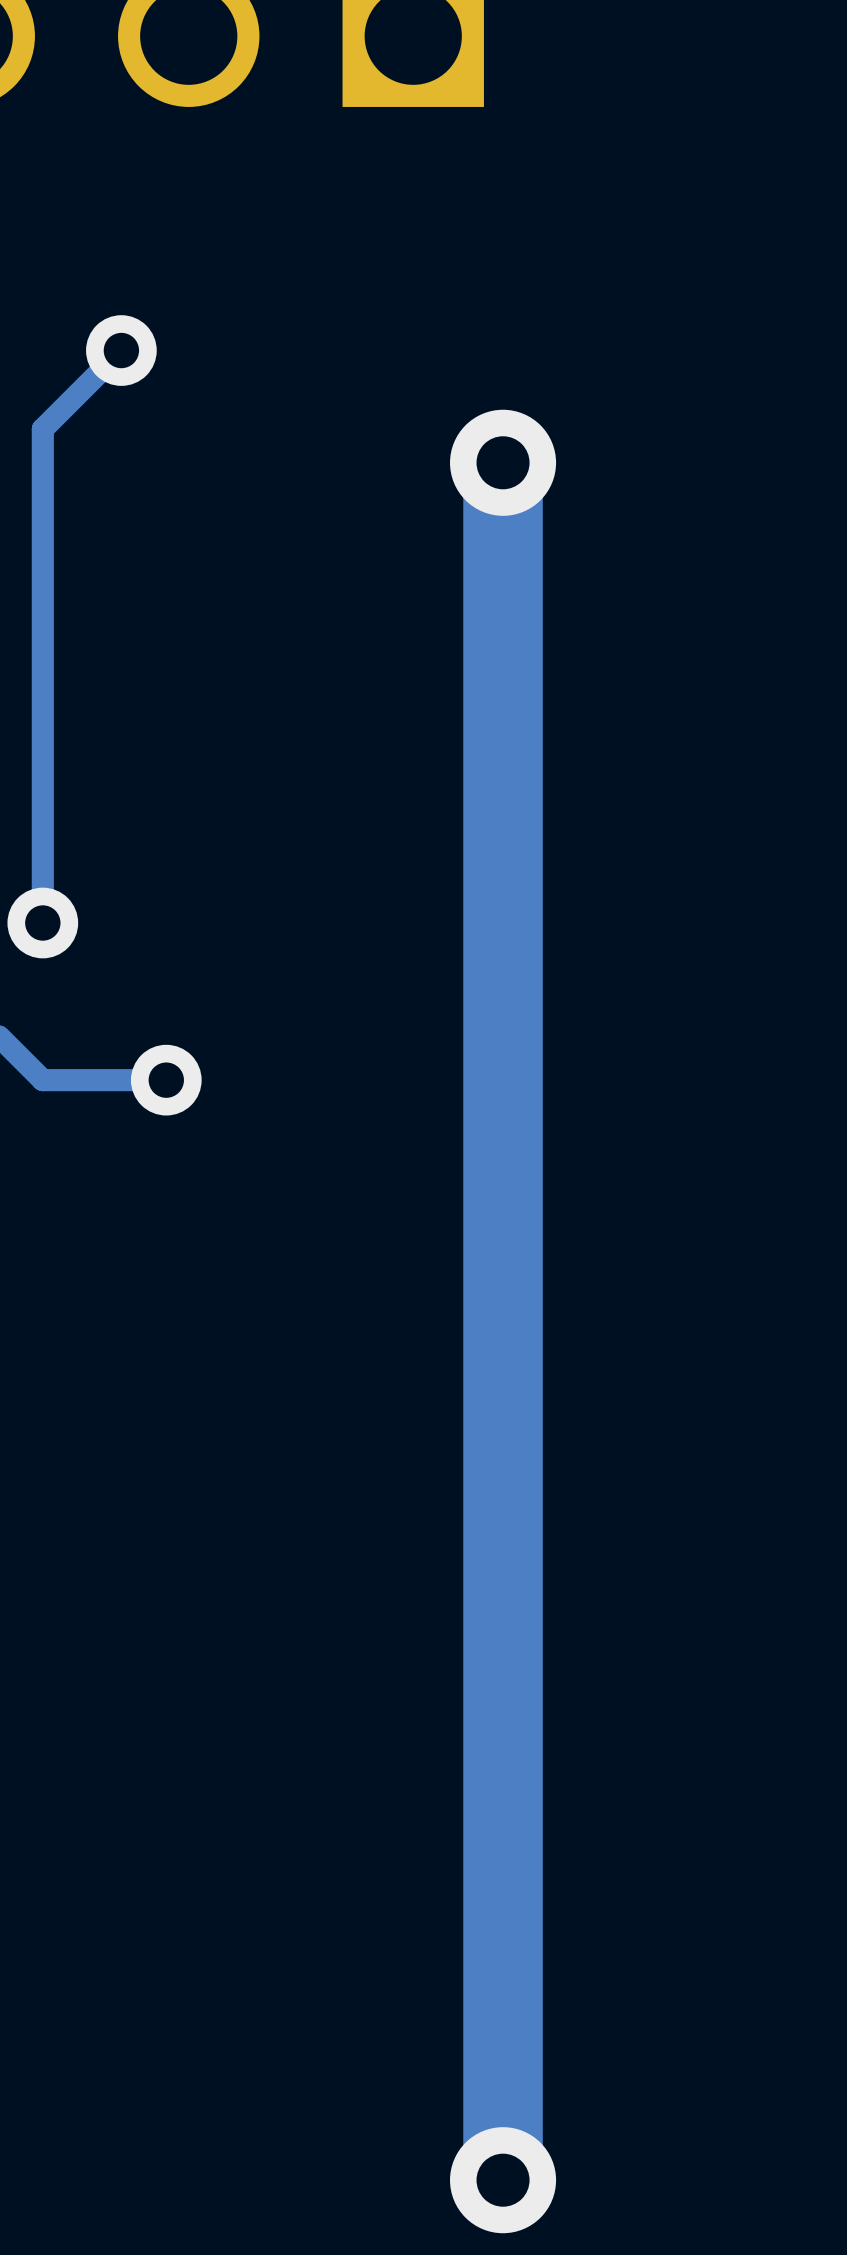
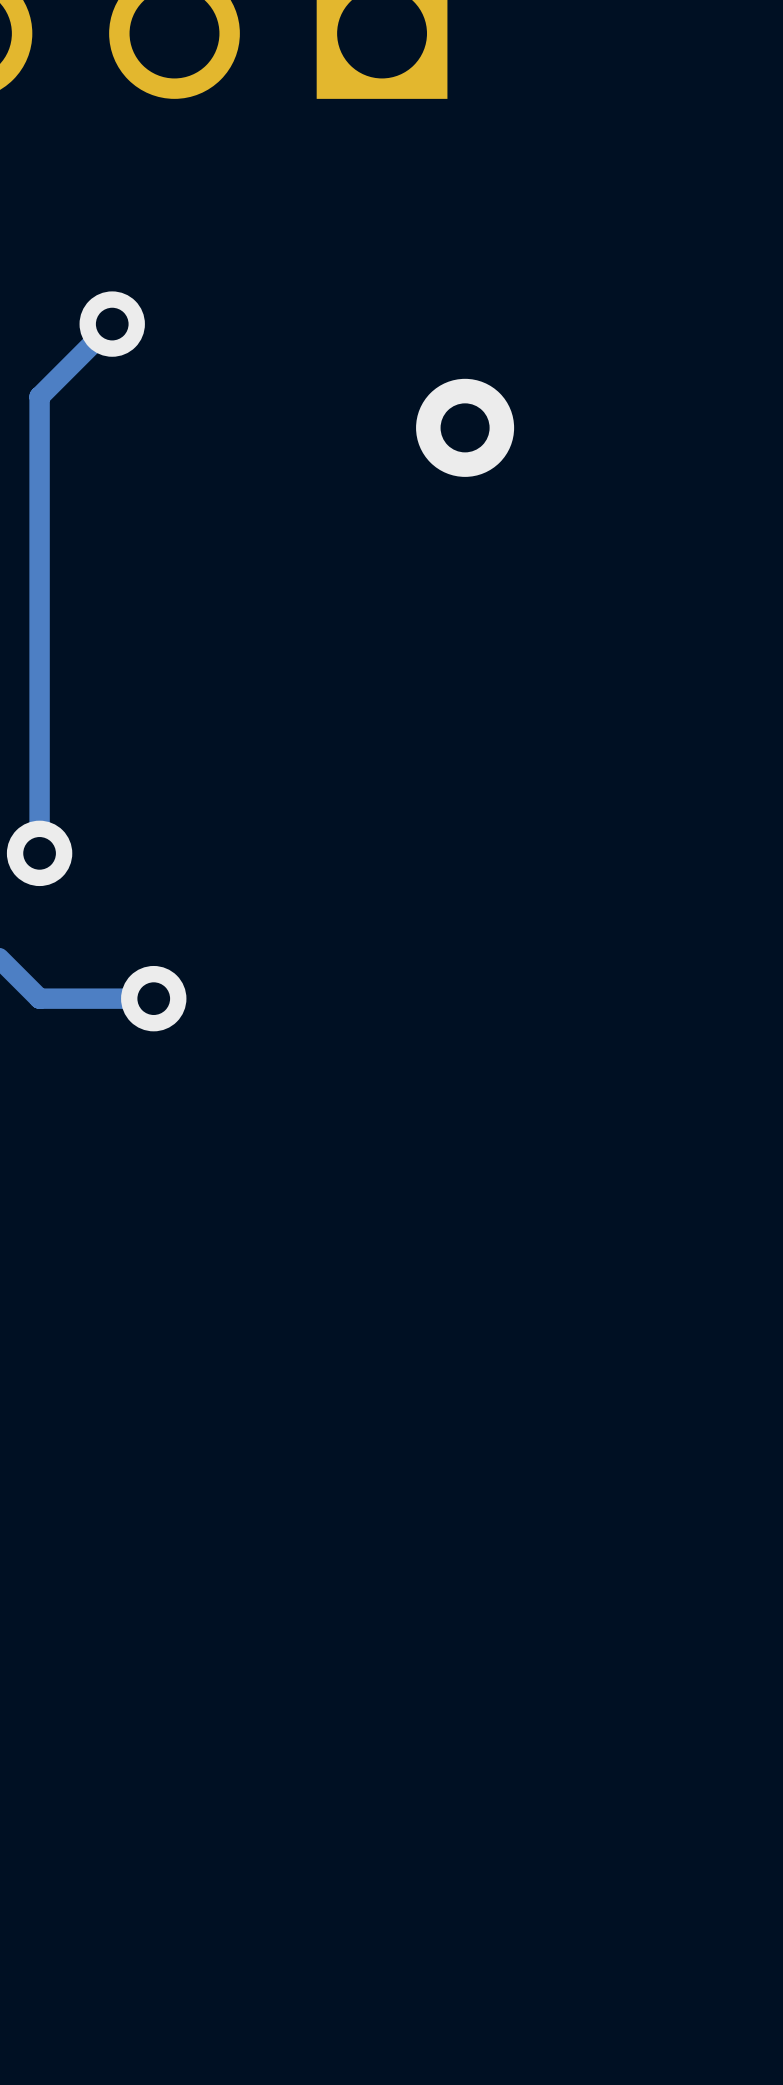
track: (503, 462) (503, 2180) -> none
via: (503, 2180) -> none

